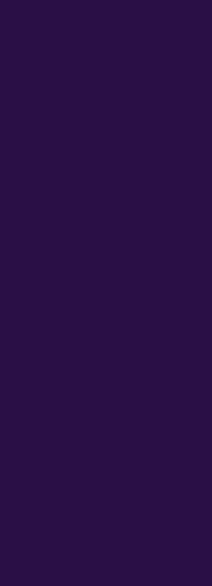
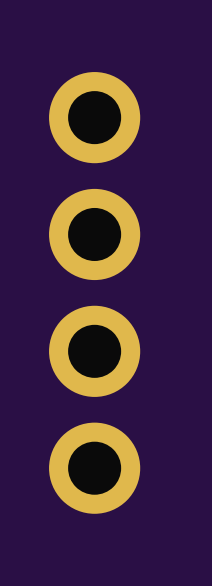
part: none -> (94, 117)
part: none -> (94, 234)
part: none -> (94, 351)
part: none -> (94, 468)

